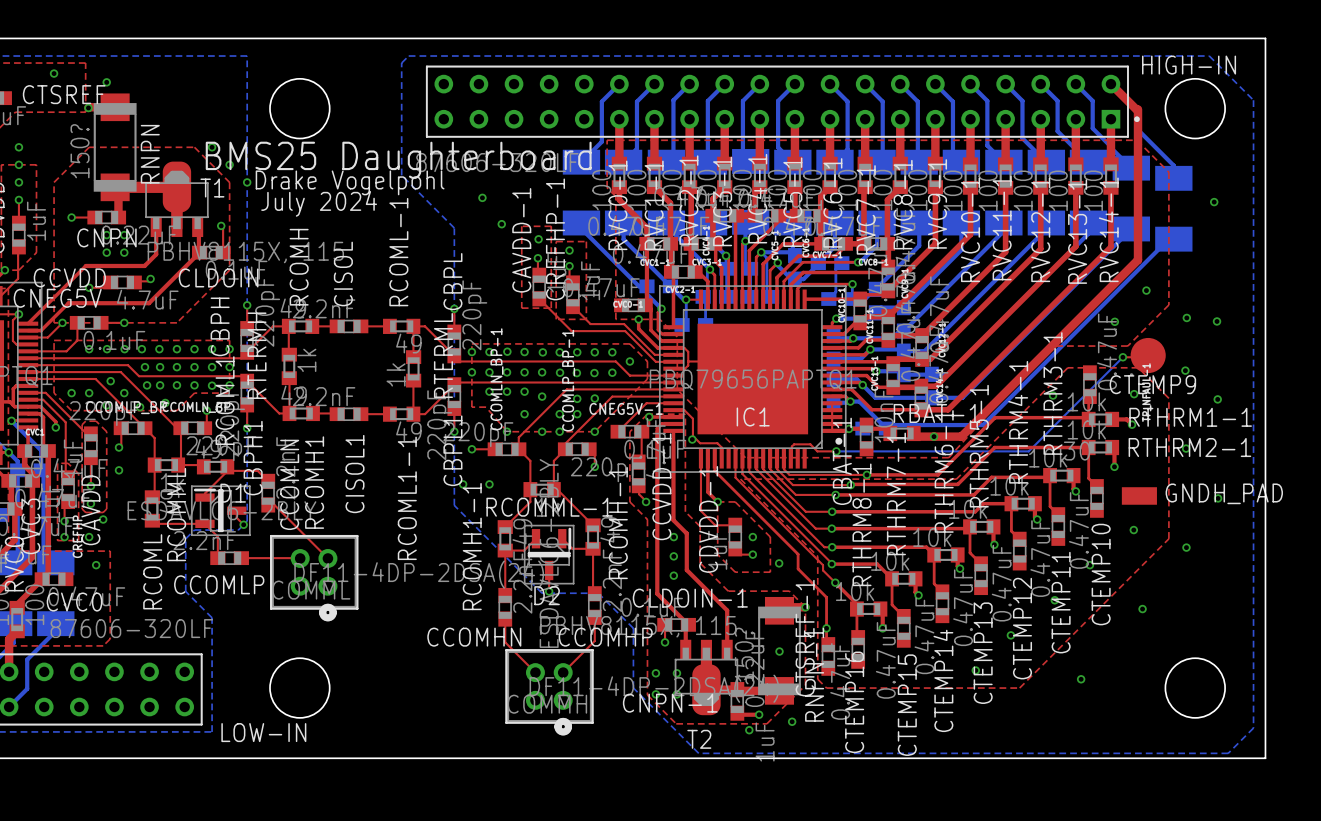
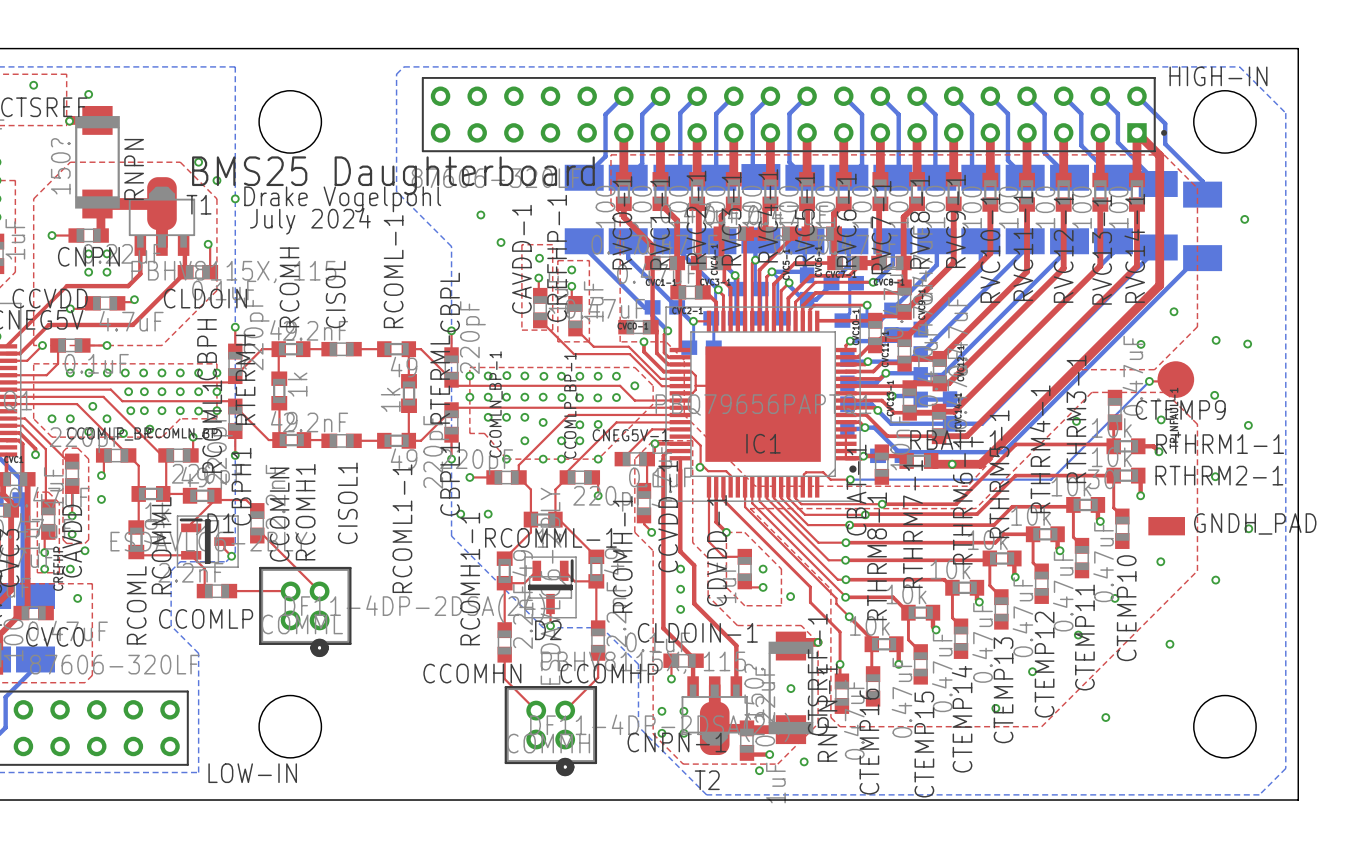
top track: (1110, 84) (1138, 109) (1138, 260) (1132, 265) -> (1136, 132) (1159, 155) (1159, 285)

